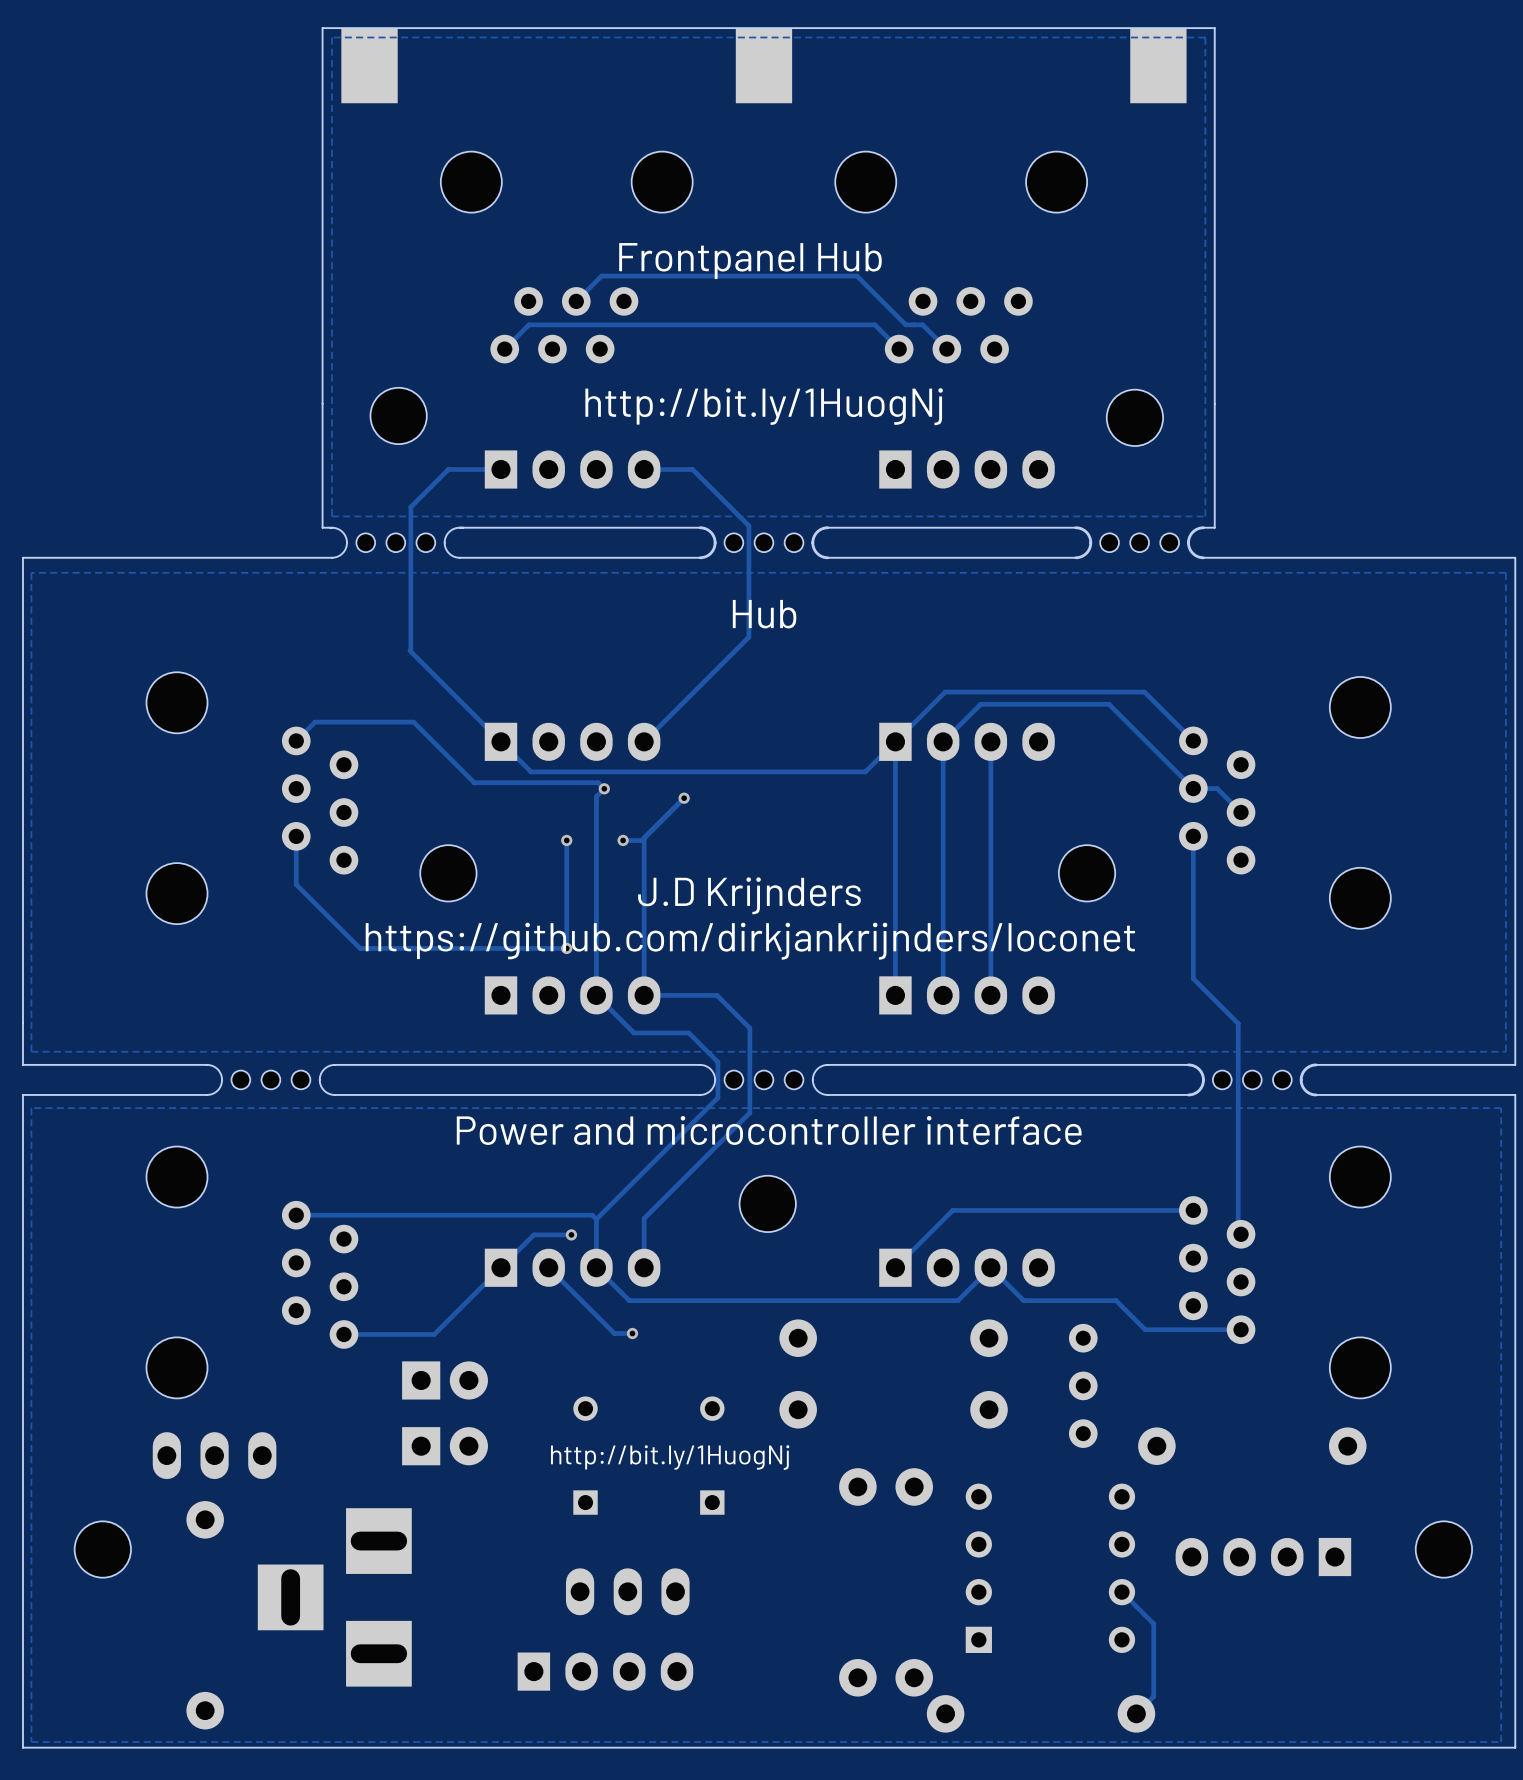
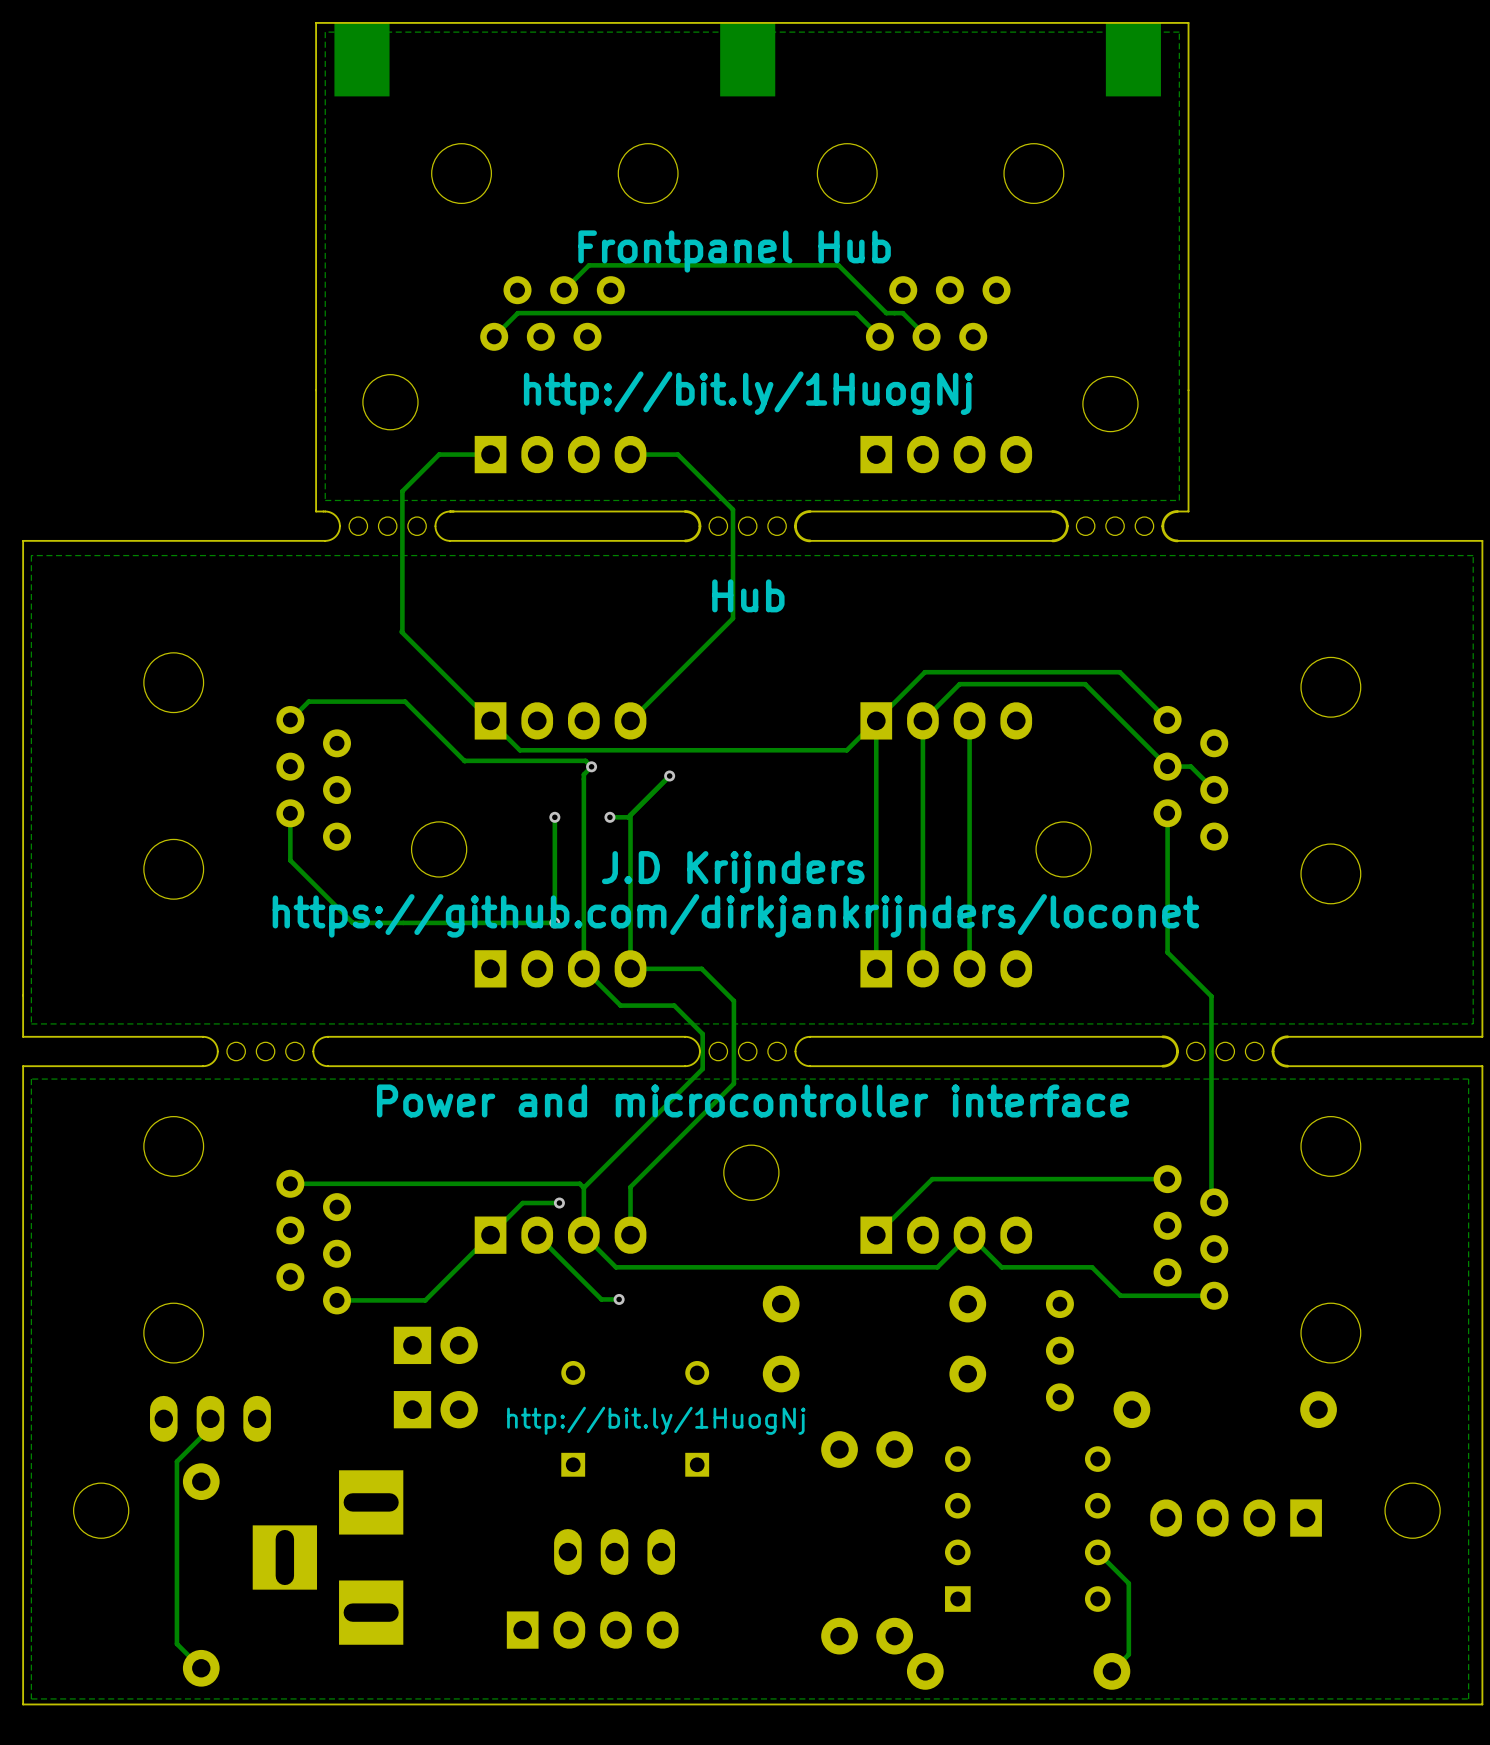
track: none -> (210, 1418) (210, 1428) (176, 1461) (176, 1643) (201, 1668)

